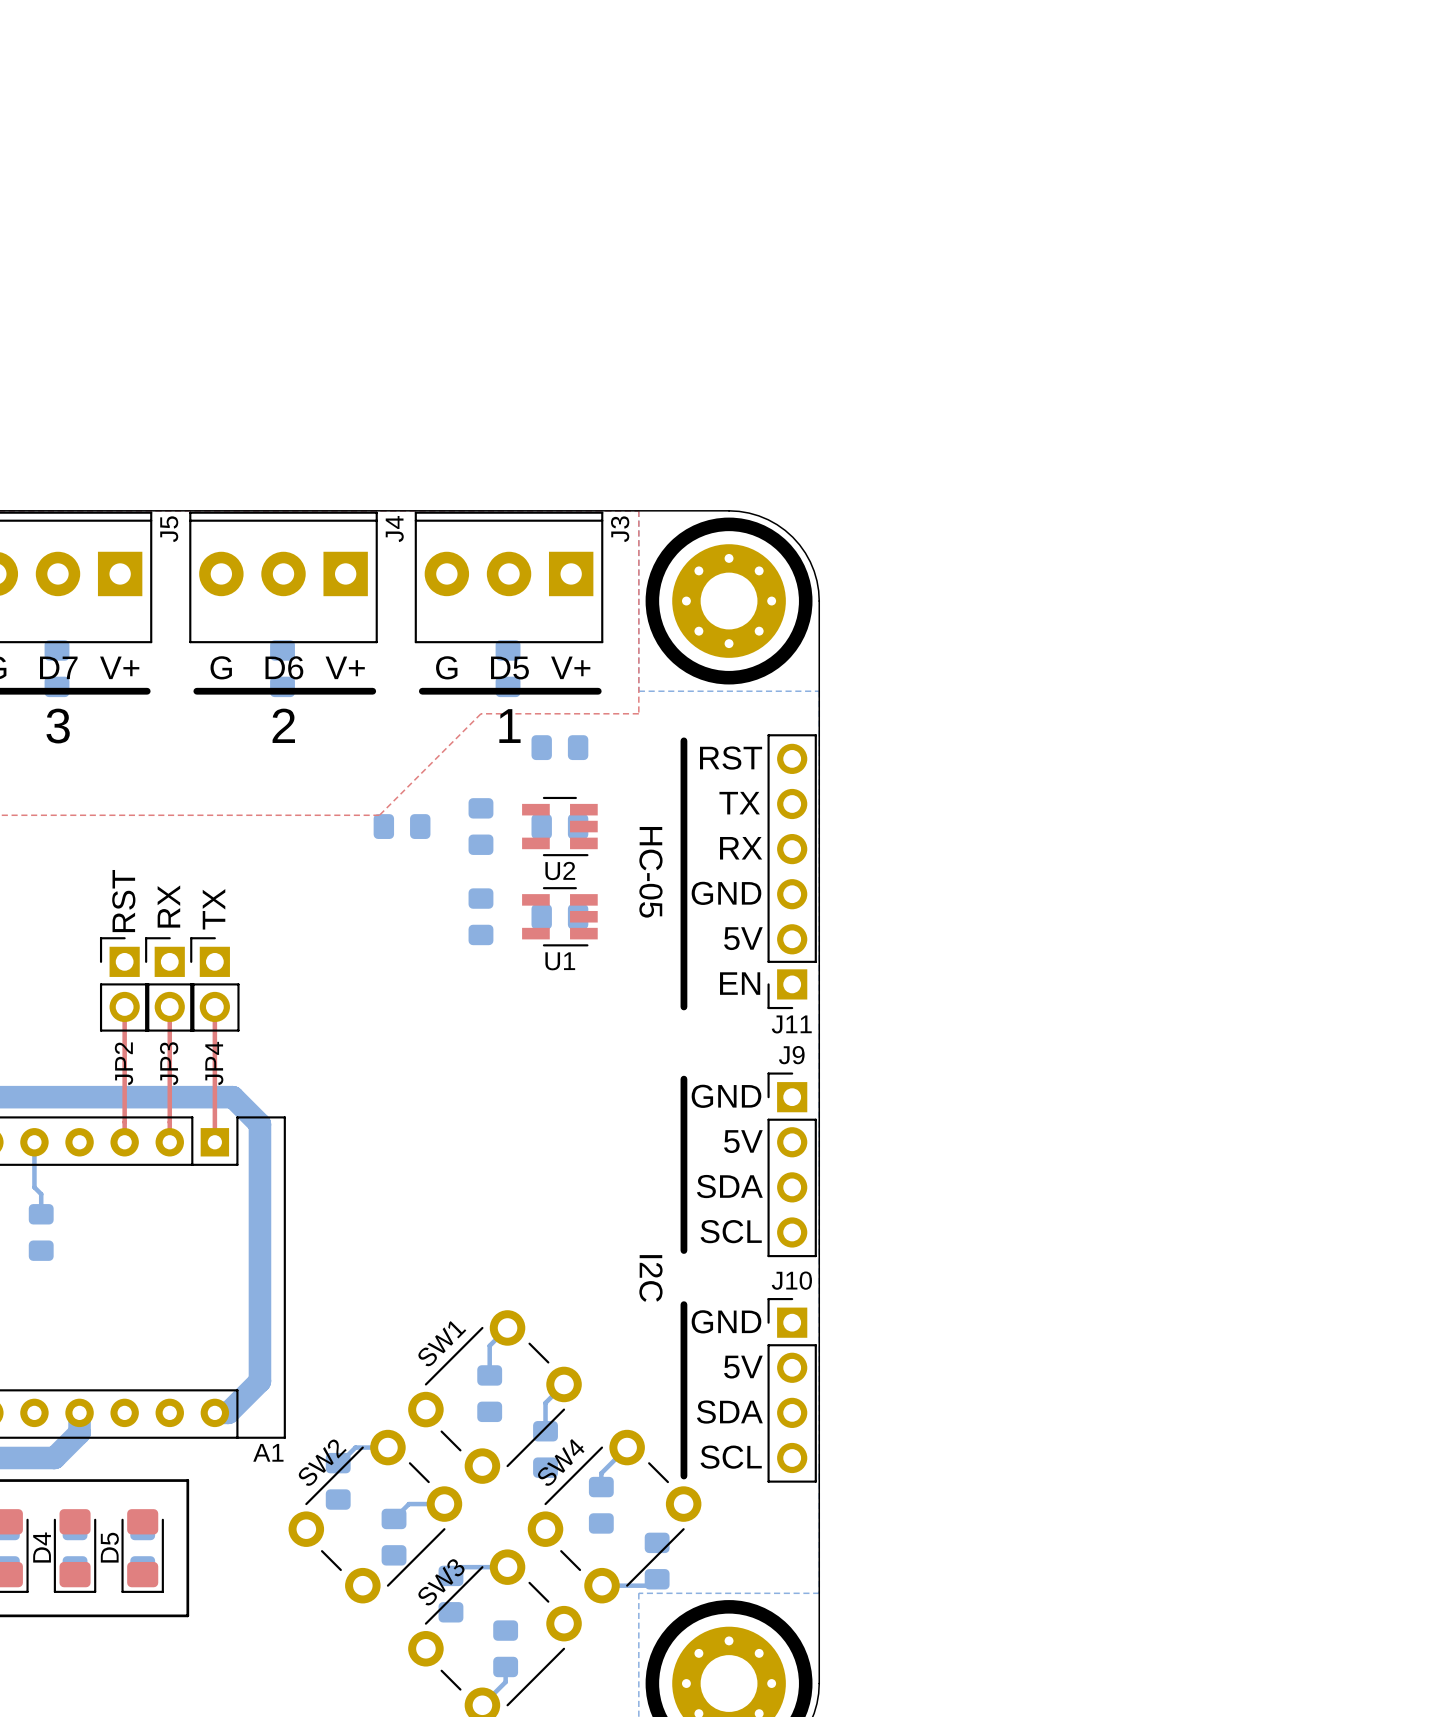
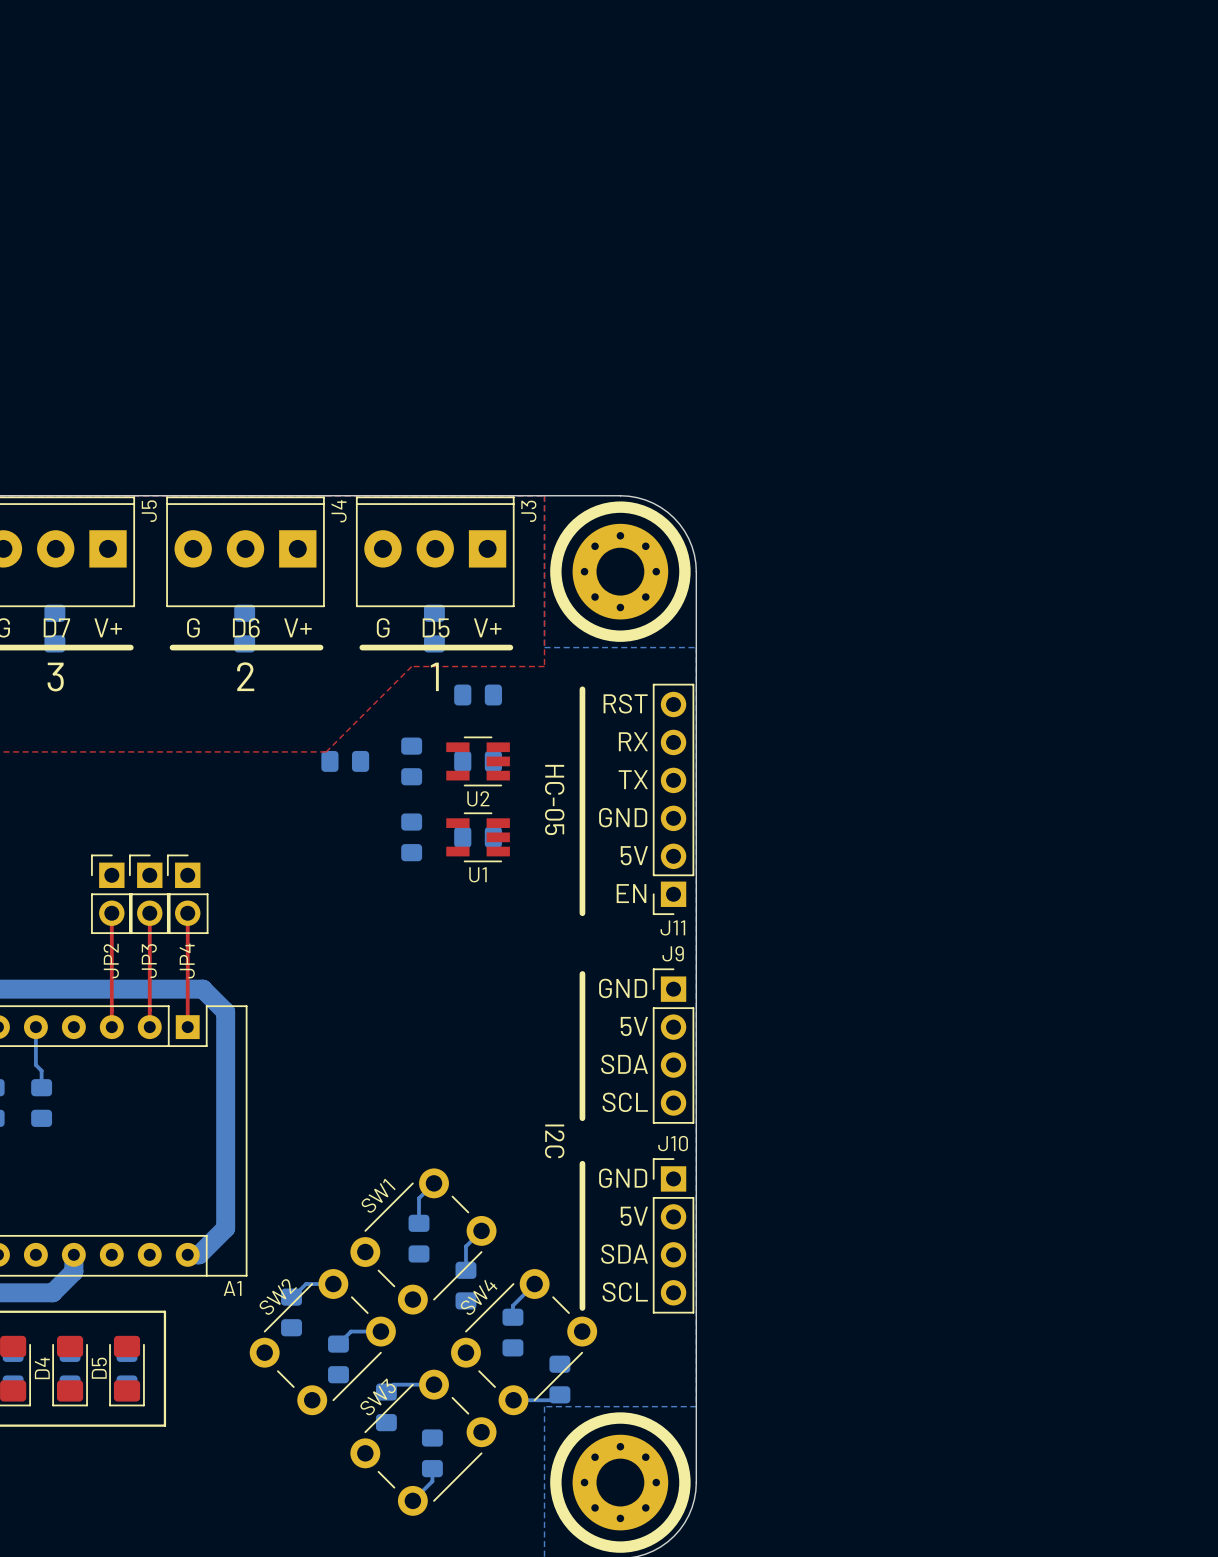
text: TX (739, 803) -> RX (633, 741)
text: RX (741, 848) -> TX (633, 779)
text: RST (123, 901) -> none
text: RX (168, 906) -> none
text: TX (214, 909) -> none

